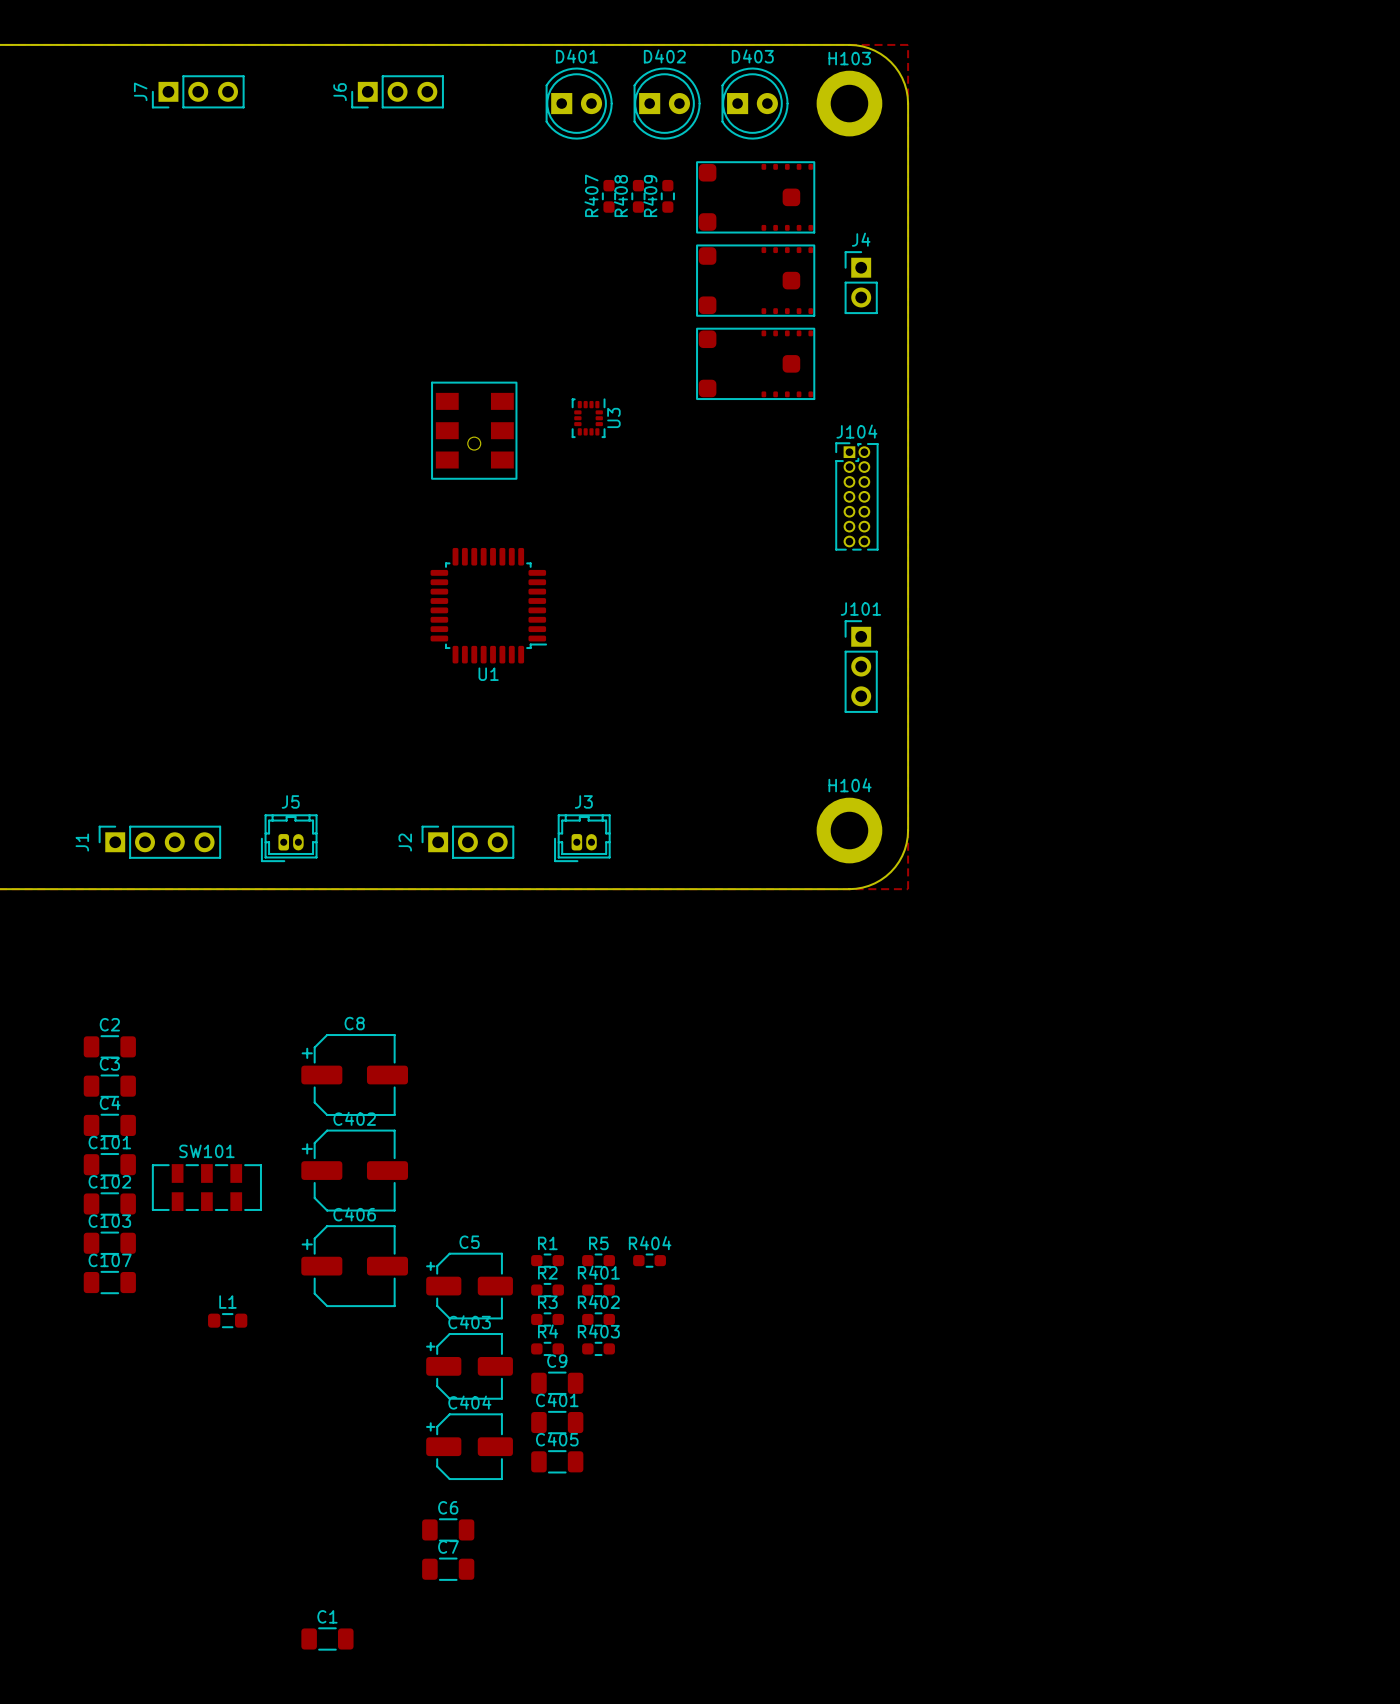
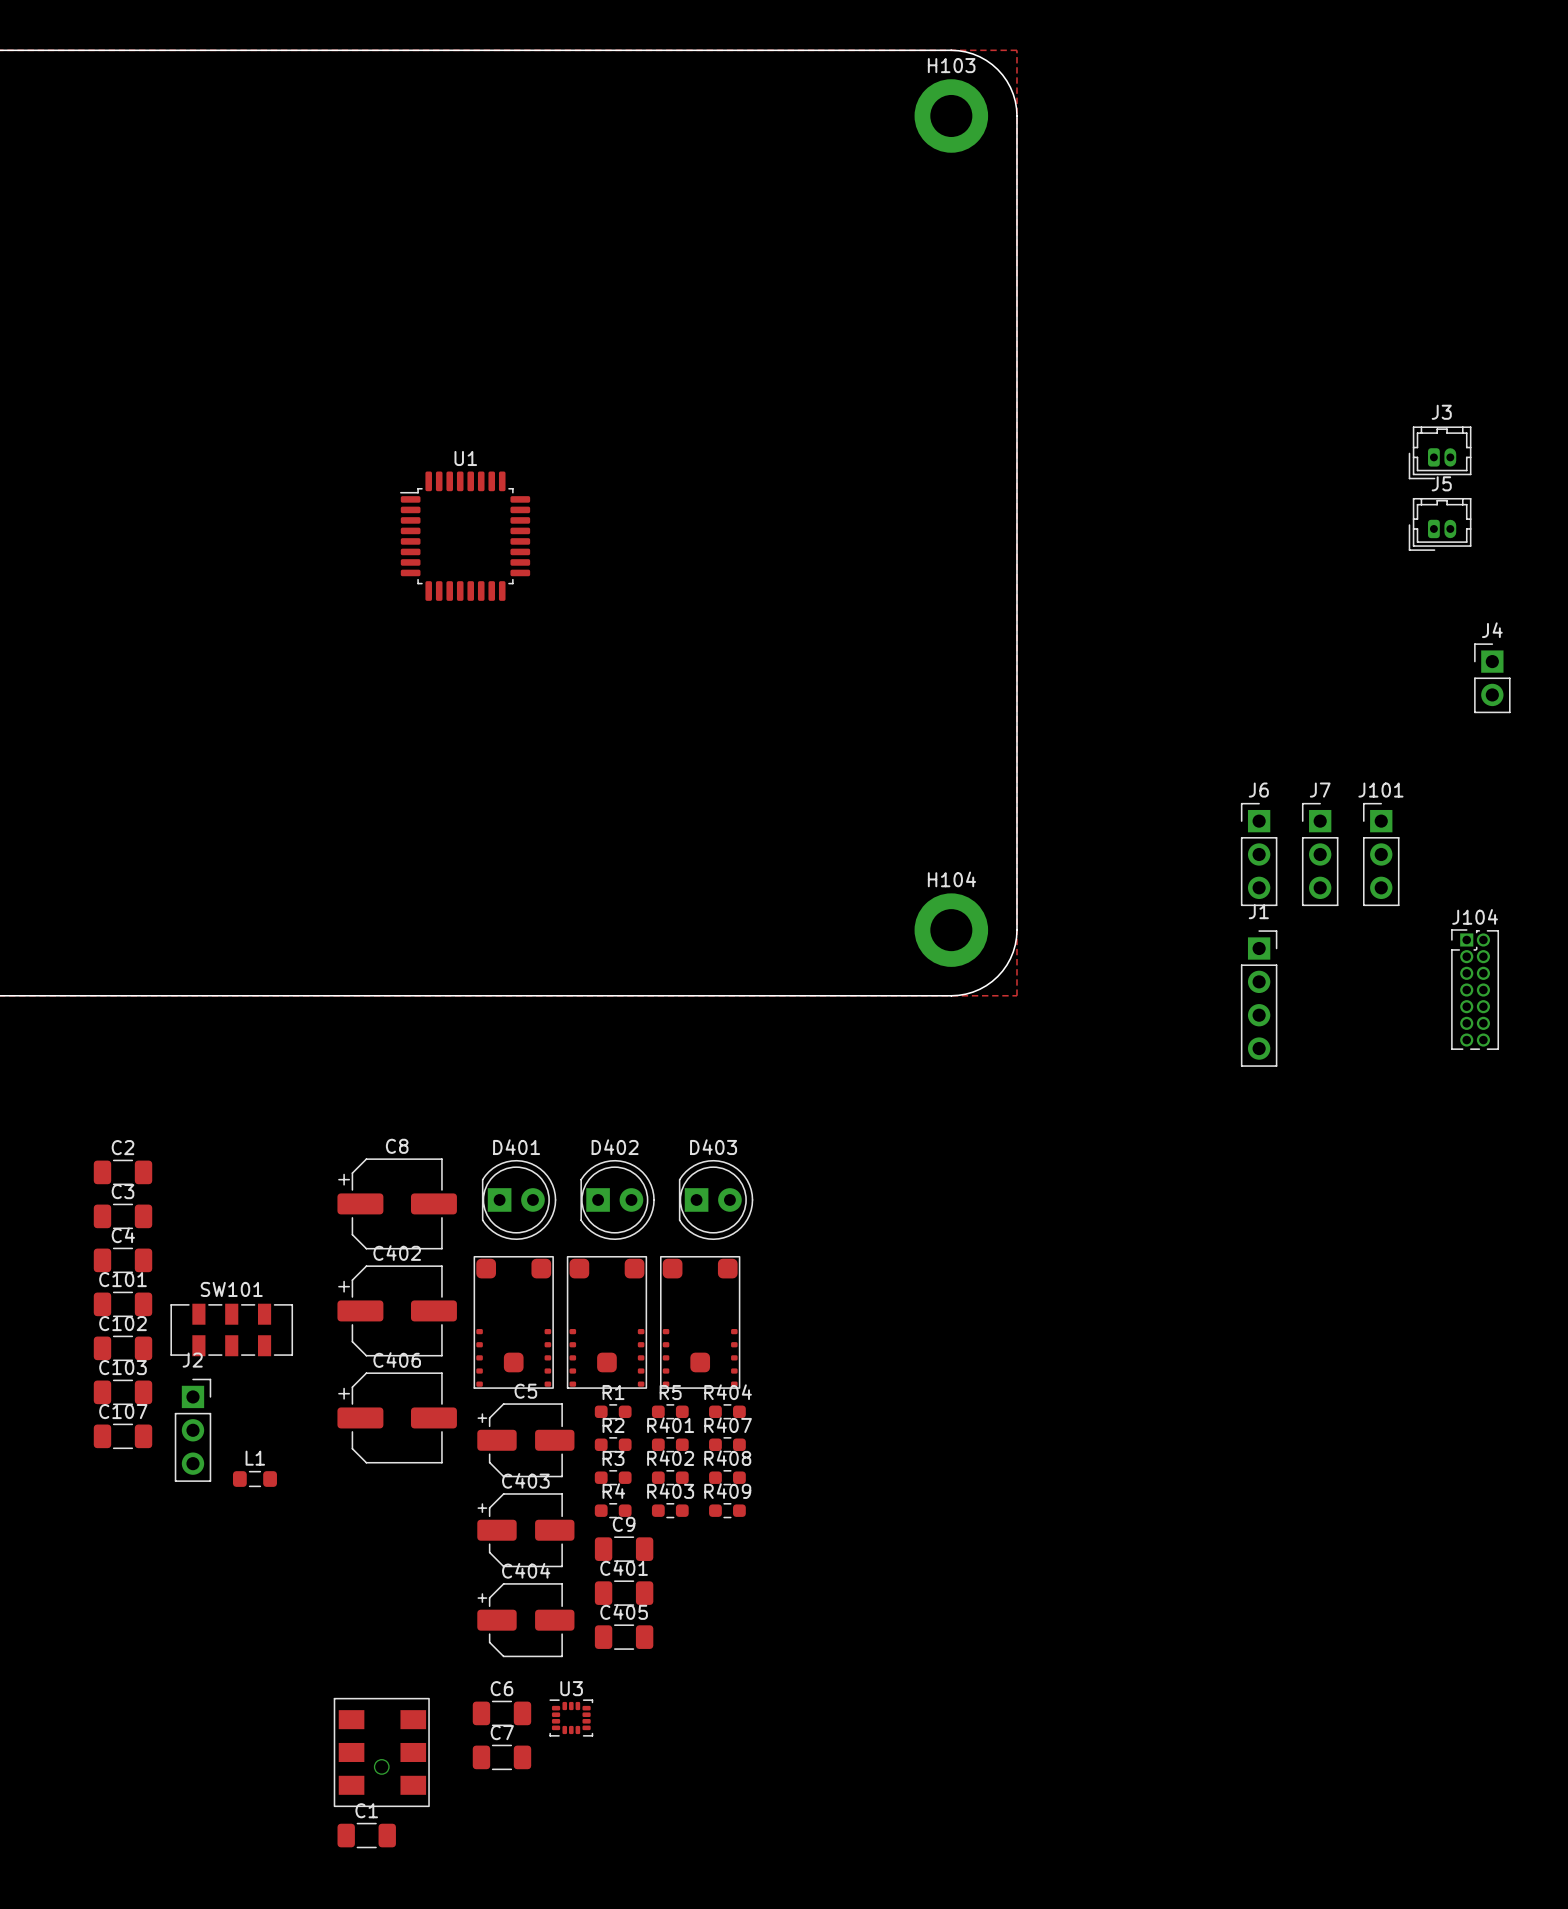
J7 rotation: 0° (198, 91) -> 90° clockwise (1320, 854)
J7 position: (198, 91) -> (1320, 854)
J6 rotation: 0° (397, 91) -> 90° clockwise (1259, 854)
J6 position: (397, 91) -> (1259, 854)
D401 position: (579, 103) -> (519, 1199)
D402 position: (667, 103) -> (617, 1199)
D403 position: (755, 103) -> (716, 1199)
R407 rotation: 0° (608, 196) -> 90° clockwise (727, 1444)
R407 position: (608, 196) -> (727, 1444)
R408 rotation: 0° (638, 196) -> 90° clockwise (727, 1477)
R408 position: (638, 196) -> (727, 1477)
R409 rotation: 0° (667, 196) -> 90° clockwise (727, 1510)
R409 position: (667, 196) -> (727, 1510)
part: (755, 197) -> none
part: (755, 280) -> none
J4 position: (861, 282) -> (1492, 678)
part: (755, 363) -> none
U3 rotation: 0° (588, 418) -> 90° counterclockwise (571, 1718)
U3 position: (588, 418) -> (571, 1718)
part: (474, 430) -> none
J104 position: (856, 496) -> (1475, 989)
U1 rotation: 0° (488, 605) -> 180° (465, 536)
U1 position: (488, 605) -> (465, 536)
J101 position: (861, 666) -> (1381, 854)
J5 position: (289, 838) -> (1440, 524)
J3 position: (582, 838) -> (1440, 452)
J1 rotation: 0° (159, 842) -> 90° clockwise (1259, 998)
J1 position: (159, 842) -> (1259, 998)
J2 rotation: 0° (467, 842) -> 90° clockwise (192, 1430)
J2 position: (467, 842) -> (192, 1430)
part: none -> (513, 1322)
part: none -> (606, 1322)
part: none -> (700, 1322)
part: none -> (381, 1752)

